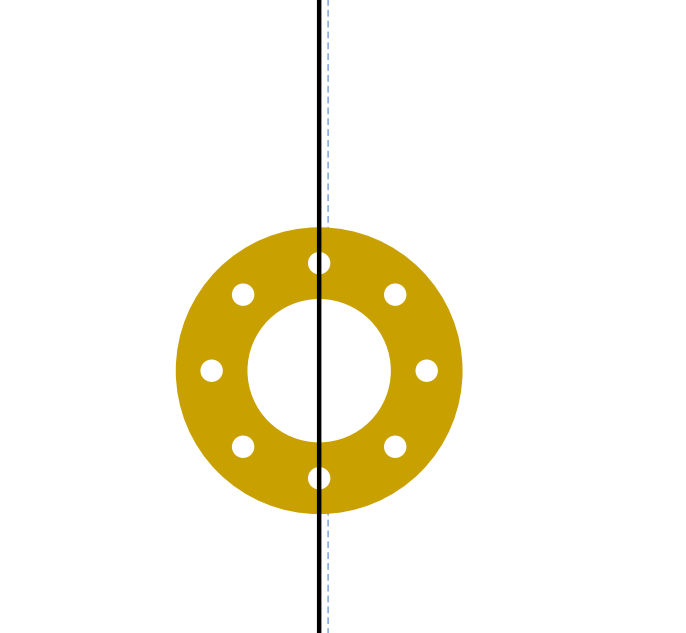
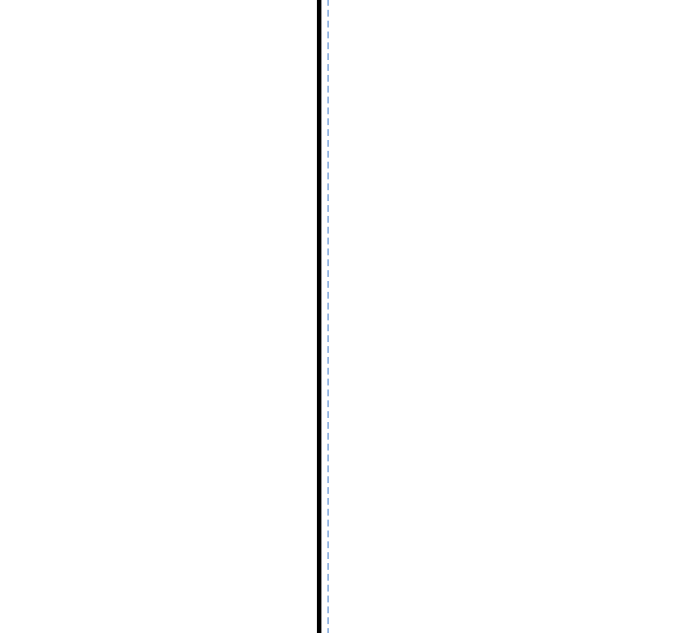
part: (319, 370) -> none

